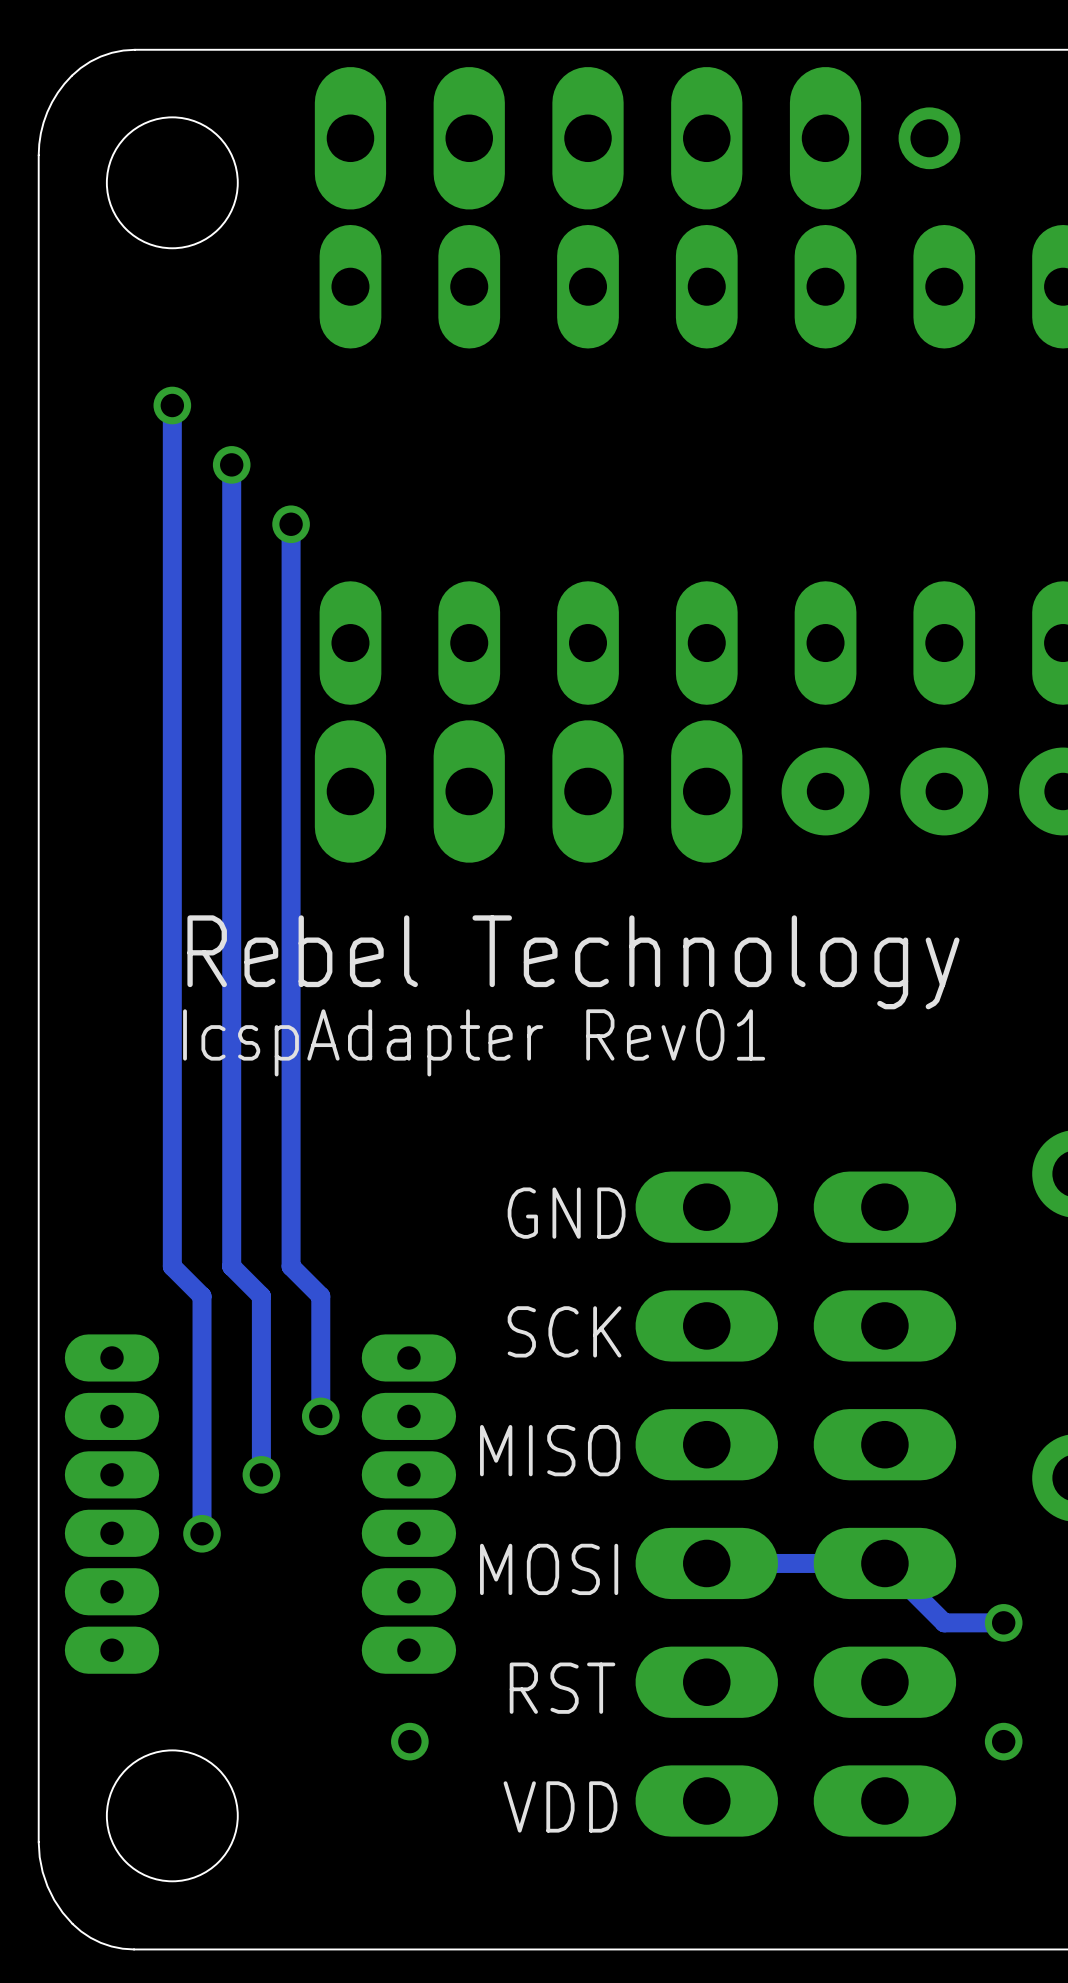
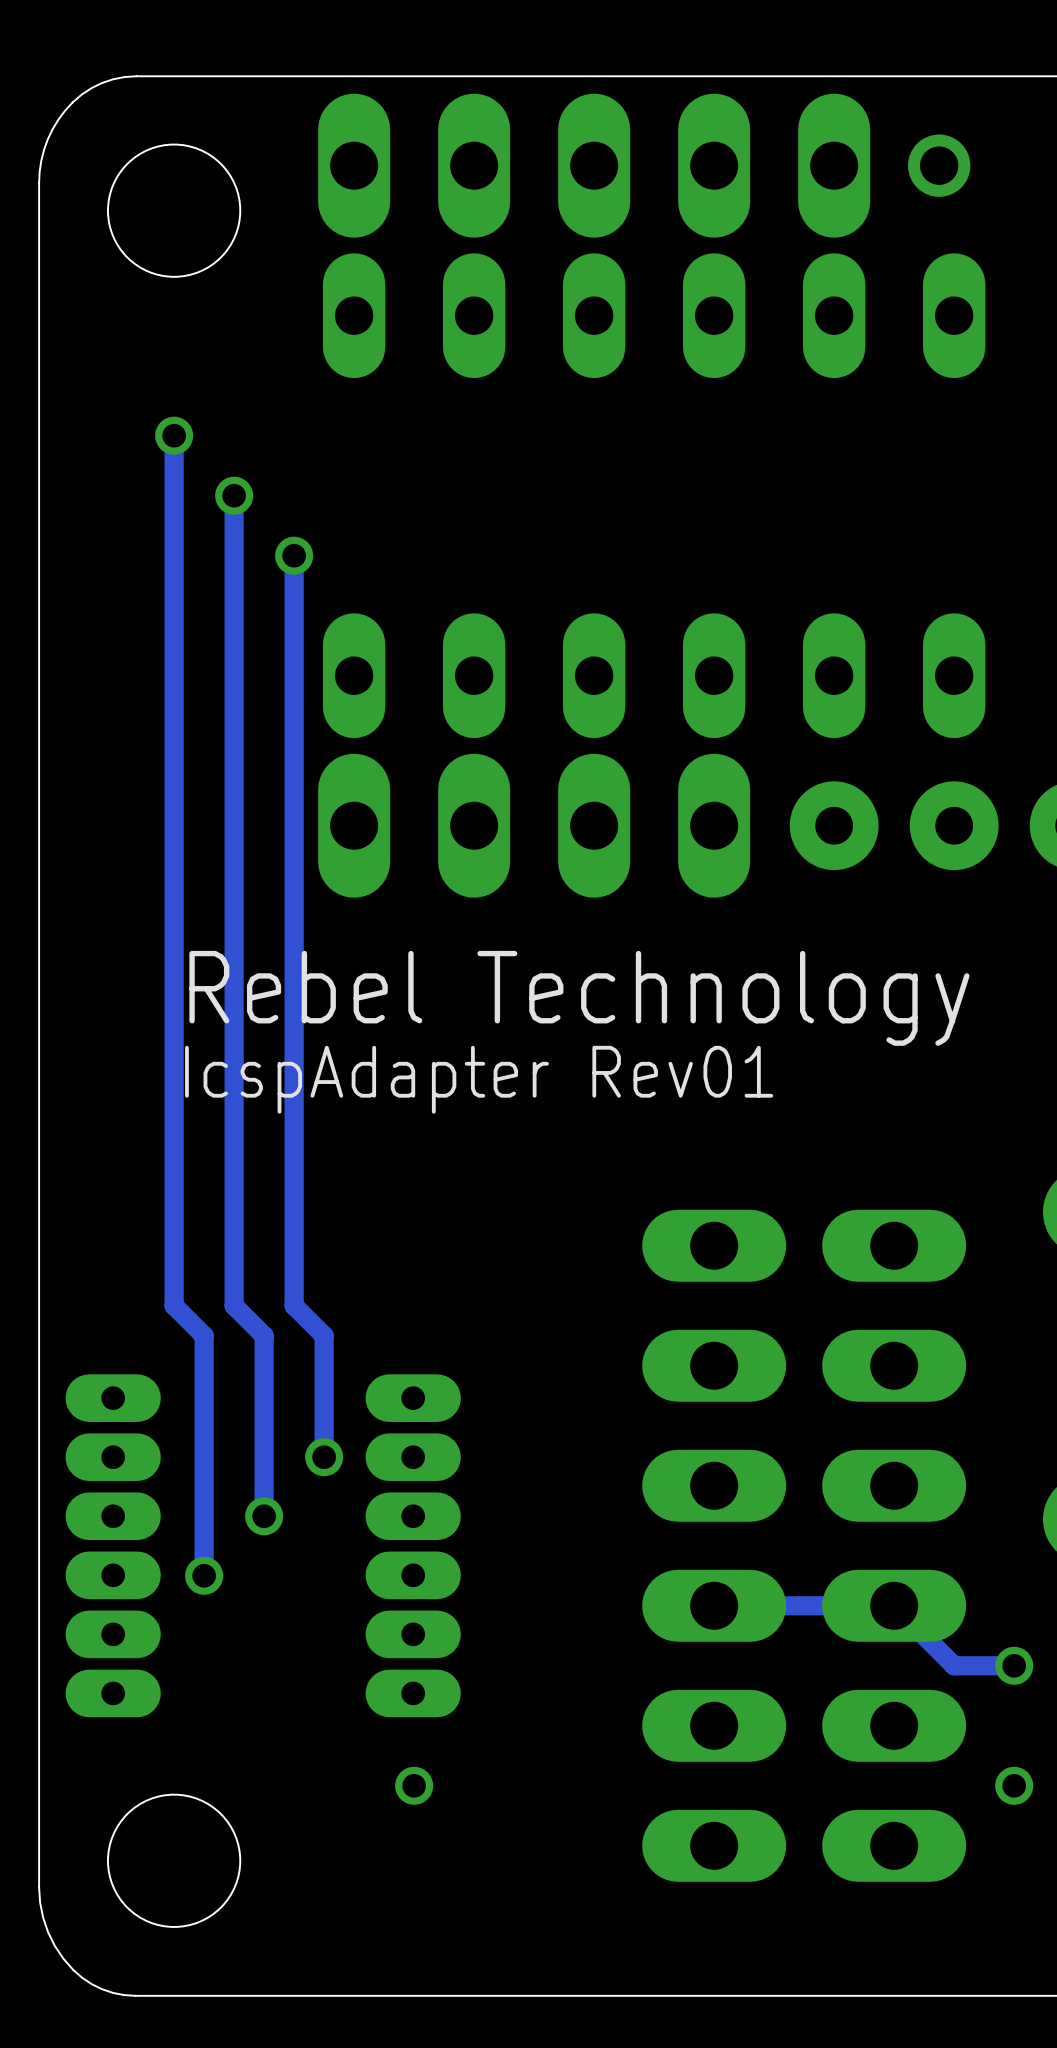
text: GND (566, 1213) -> none
text: SCK (564, 1331) -> none
text: MISO (550, 1450) -> none
text: MOSI (549, 1569) -> none
text: RST (562, 1688) -> none
text: VDD (560, 1806) -> none

